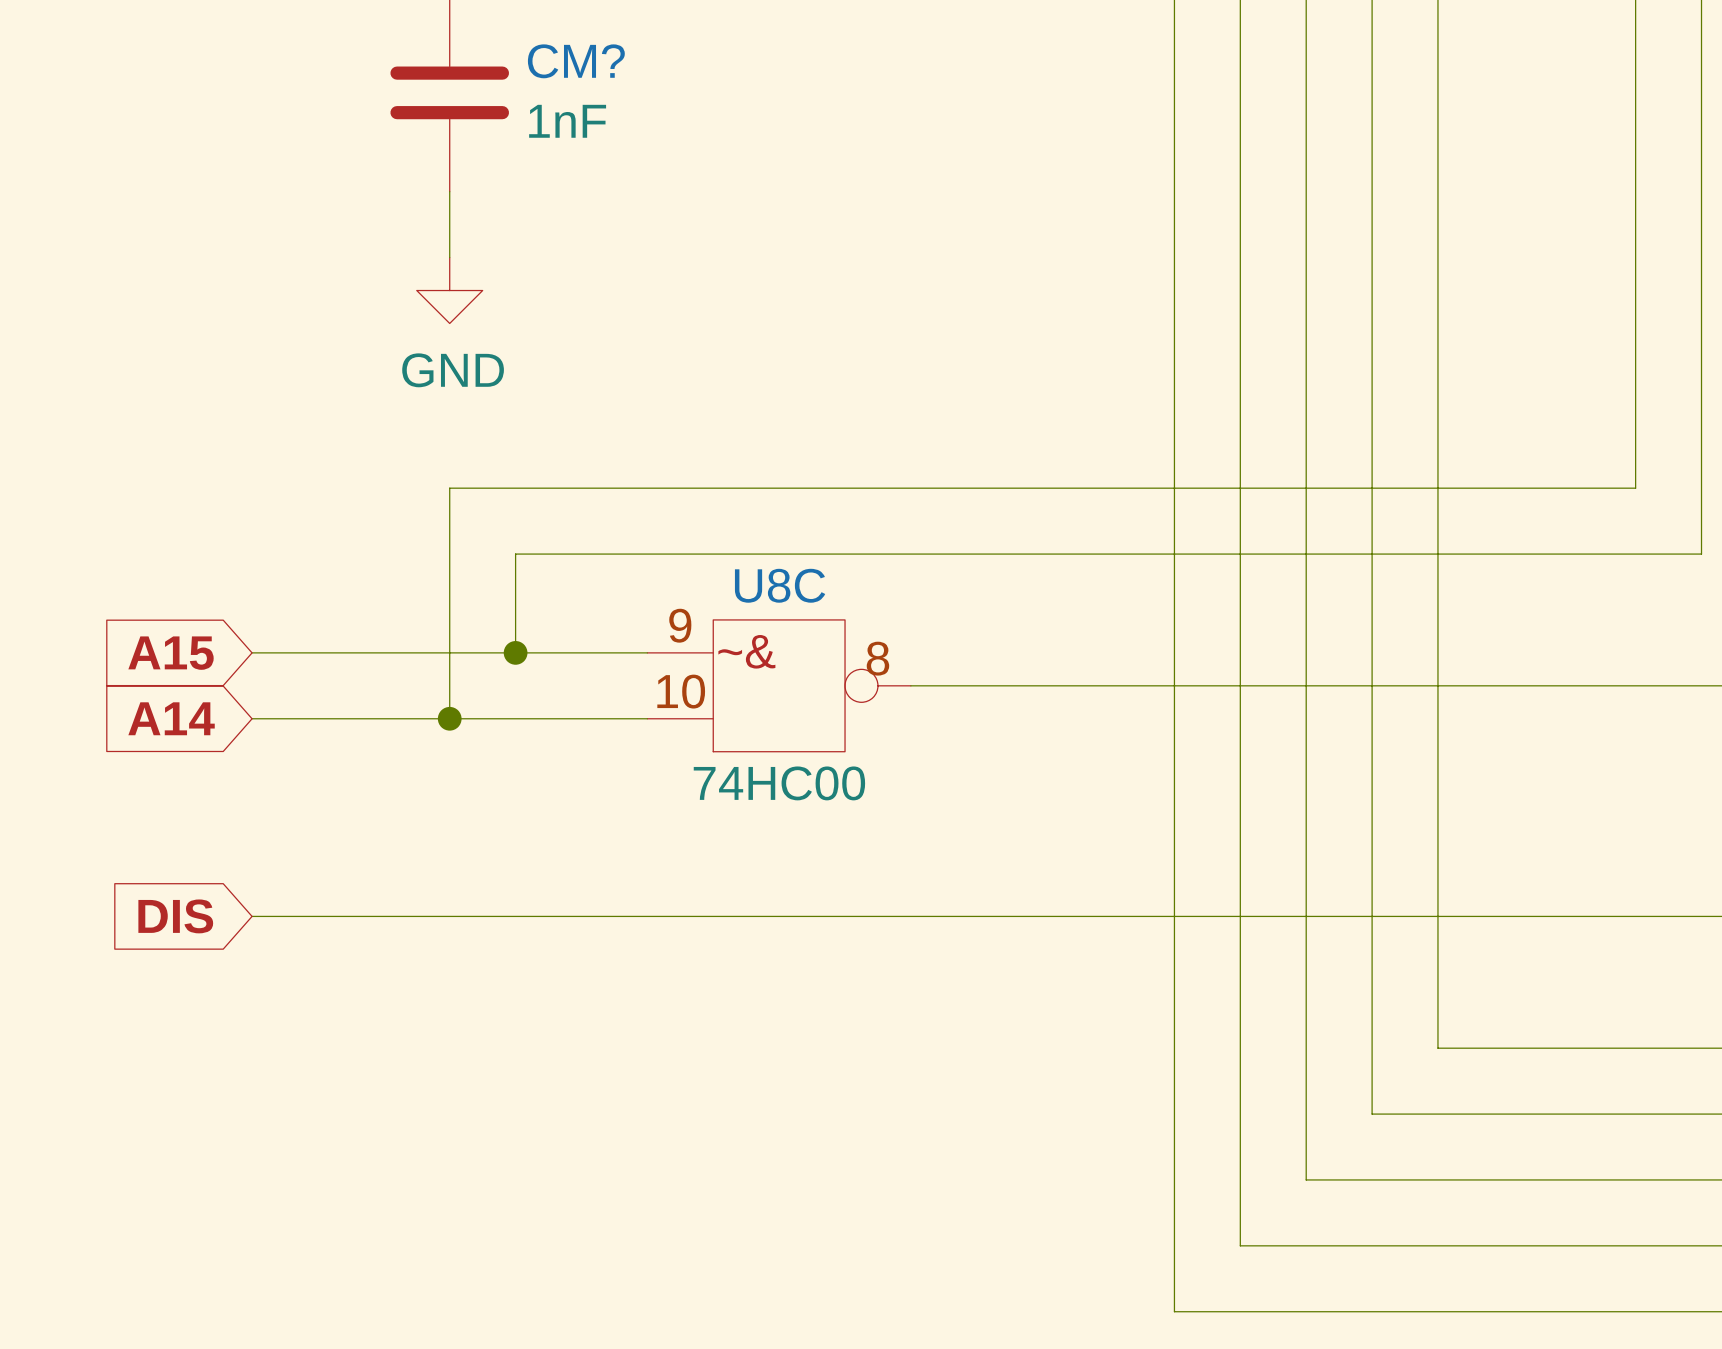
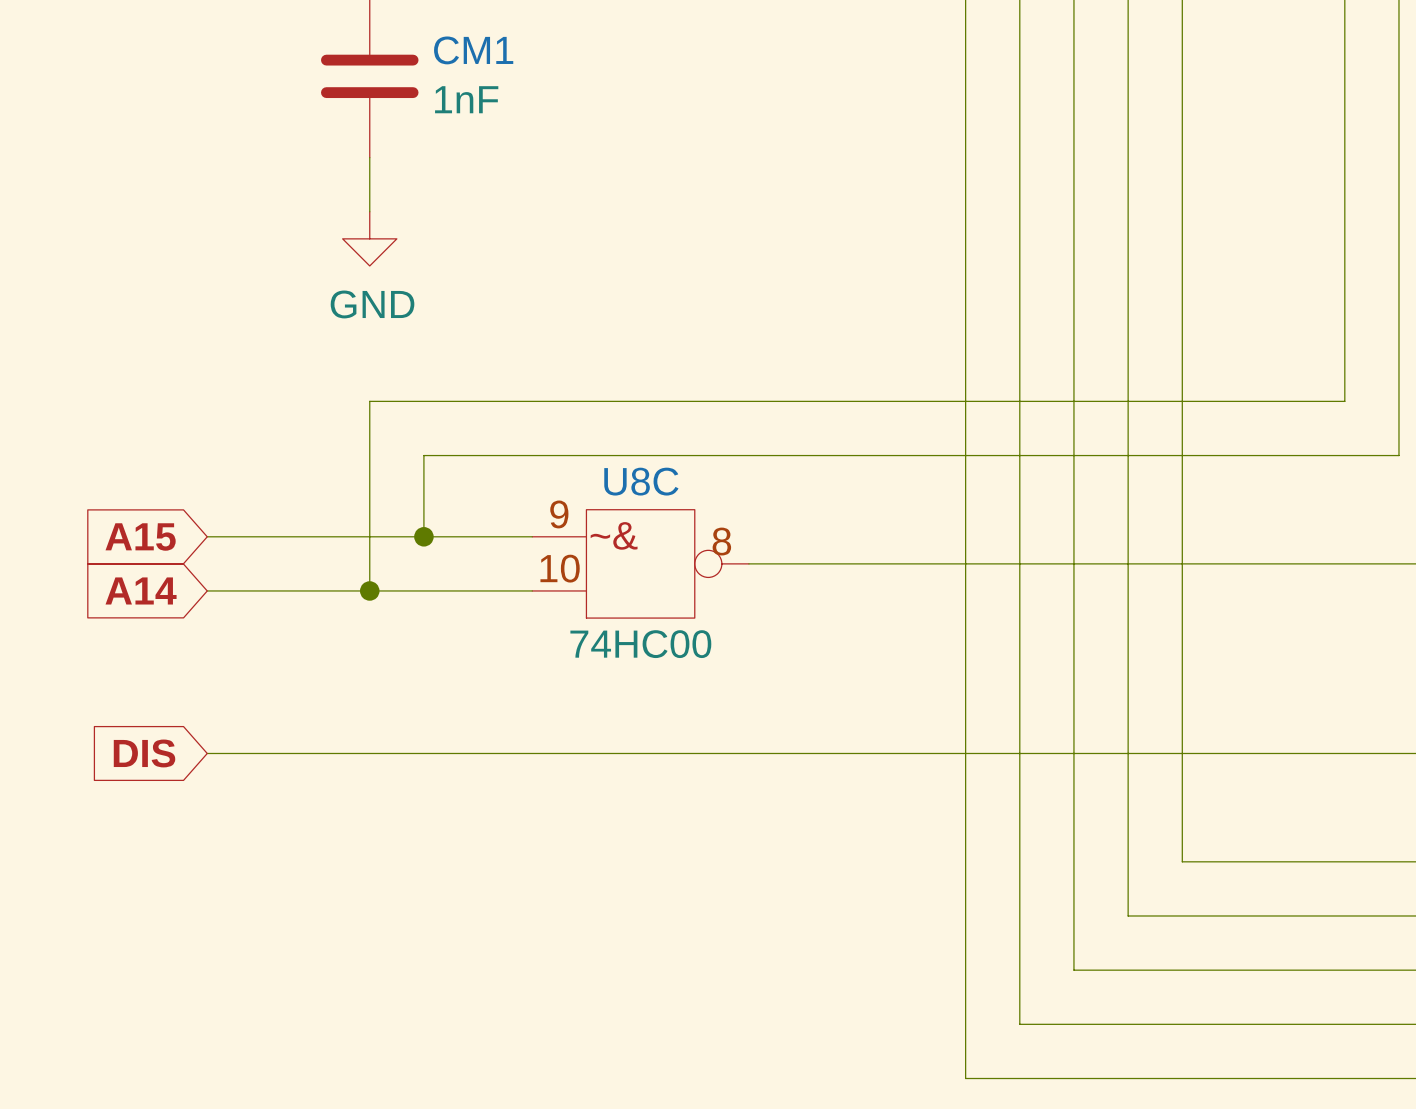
CM? name: CM? (576, 61) -> CM1 (473, 50)

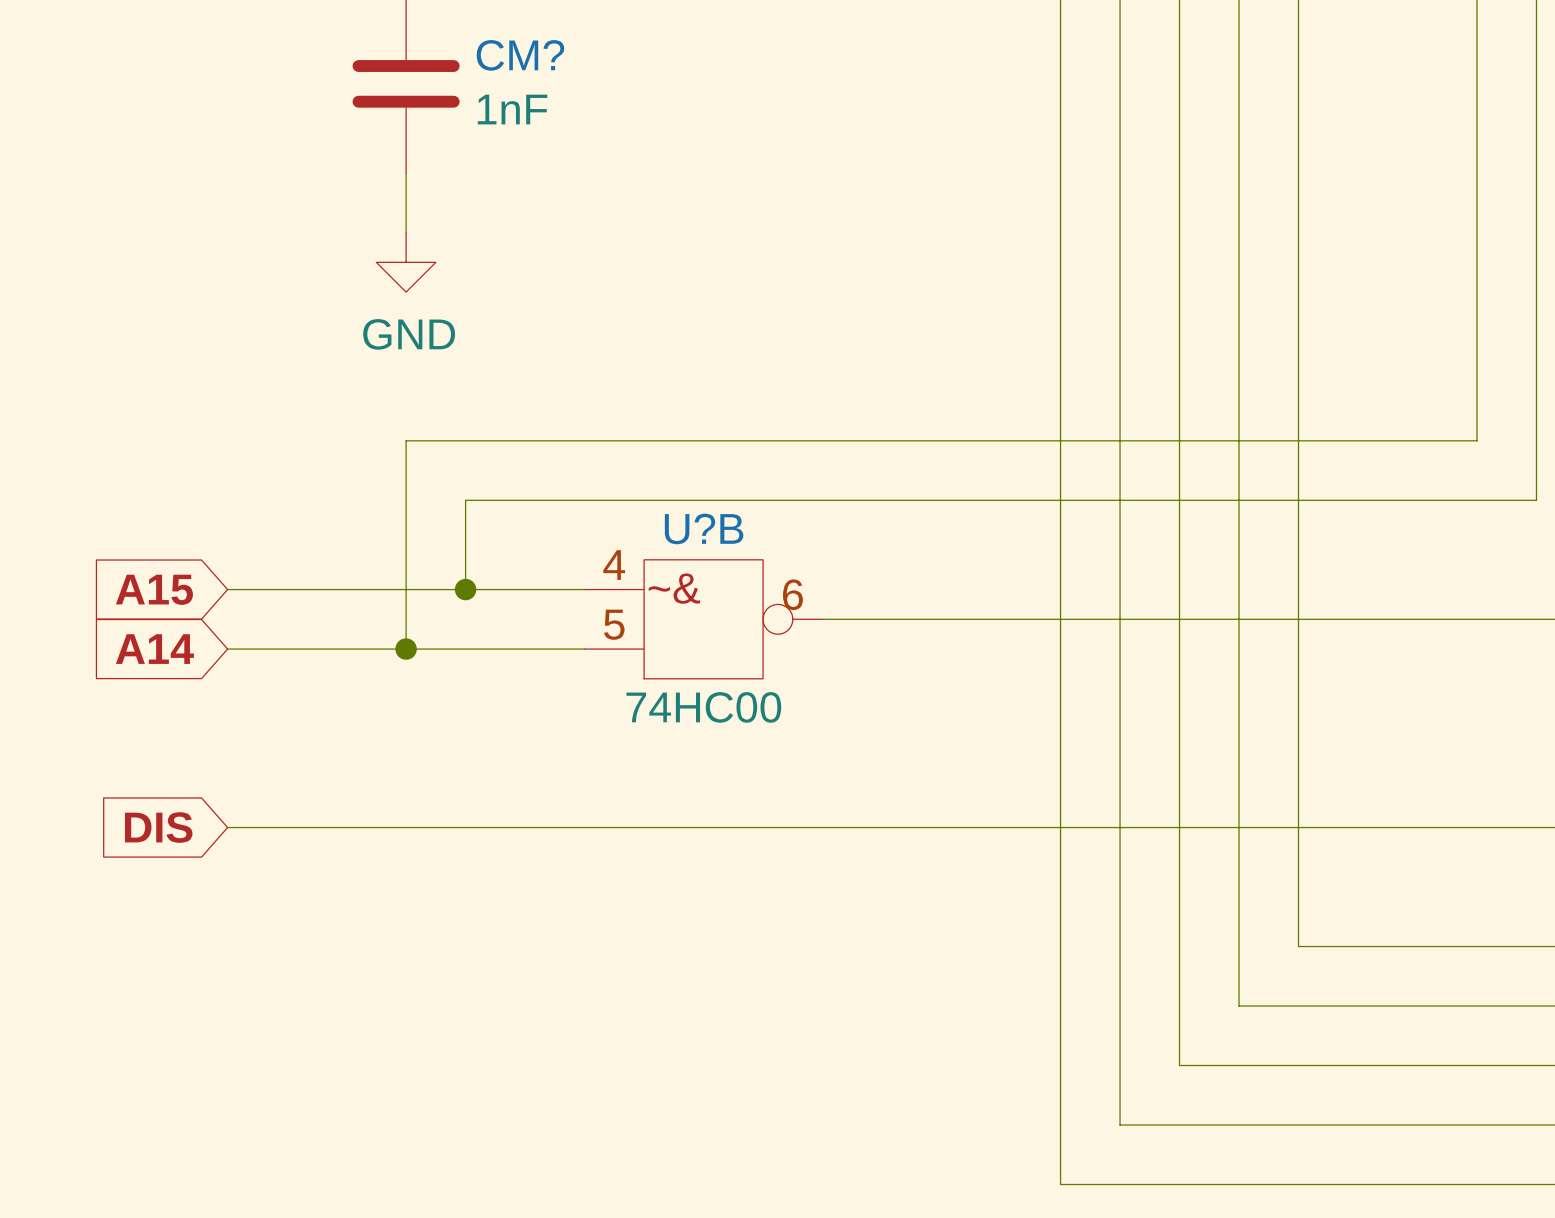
CM1 name: CM1 (473, 50) -> CM? (520, 55)
U8C name: U8C (641, 481) -> U?B (704, 528)
U8C pin number: 9 (559, 514) -> 4 (614, 565)
U8C pin number: 8 (721, 541) -> 6 (792, 594)
U8C pin number: 10 (560, 568) -> 5 (614, 624)

